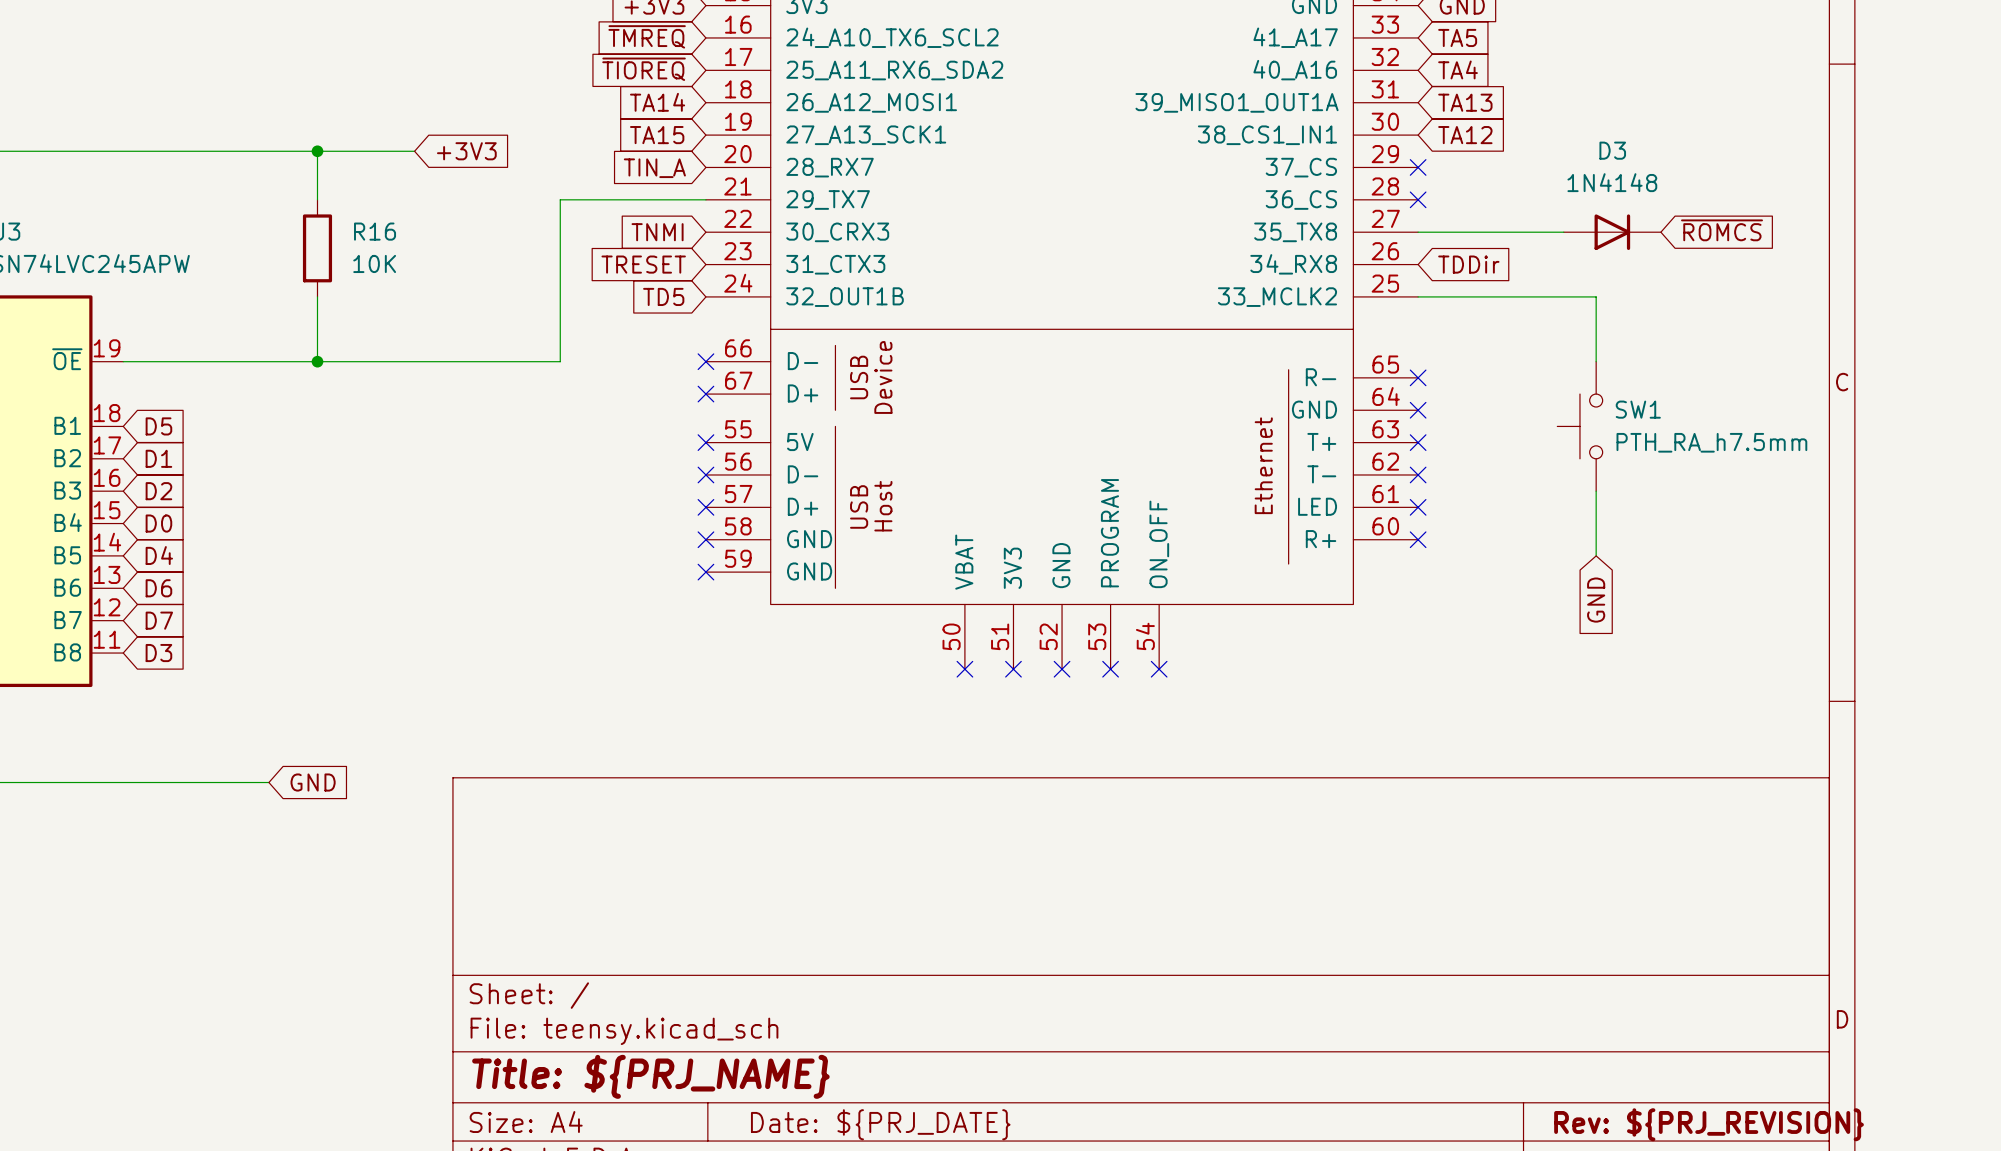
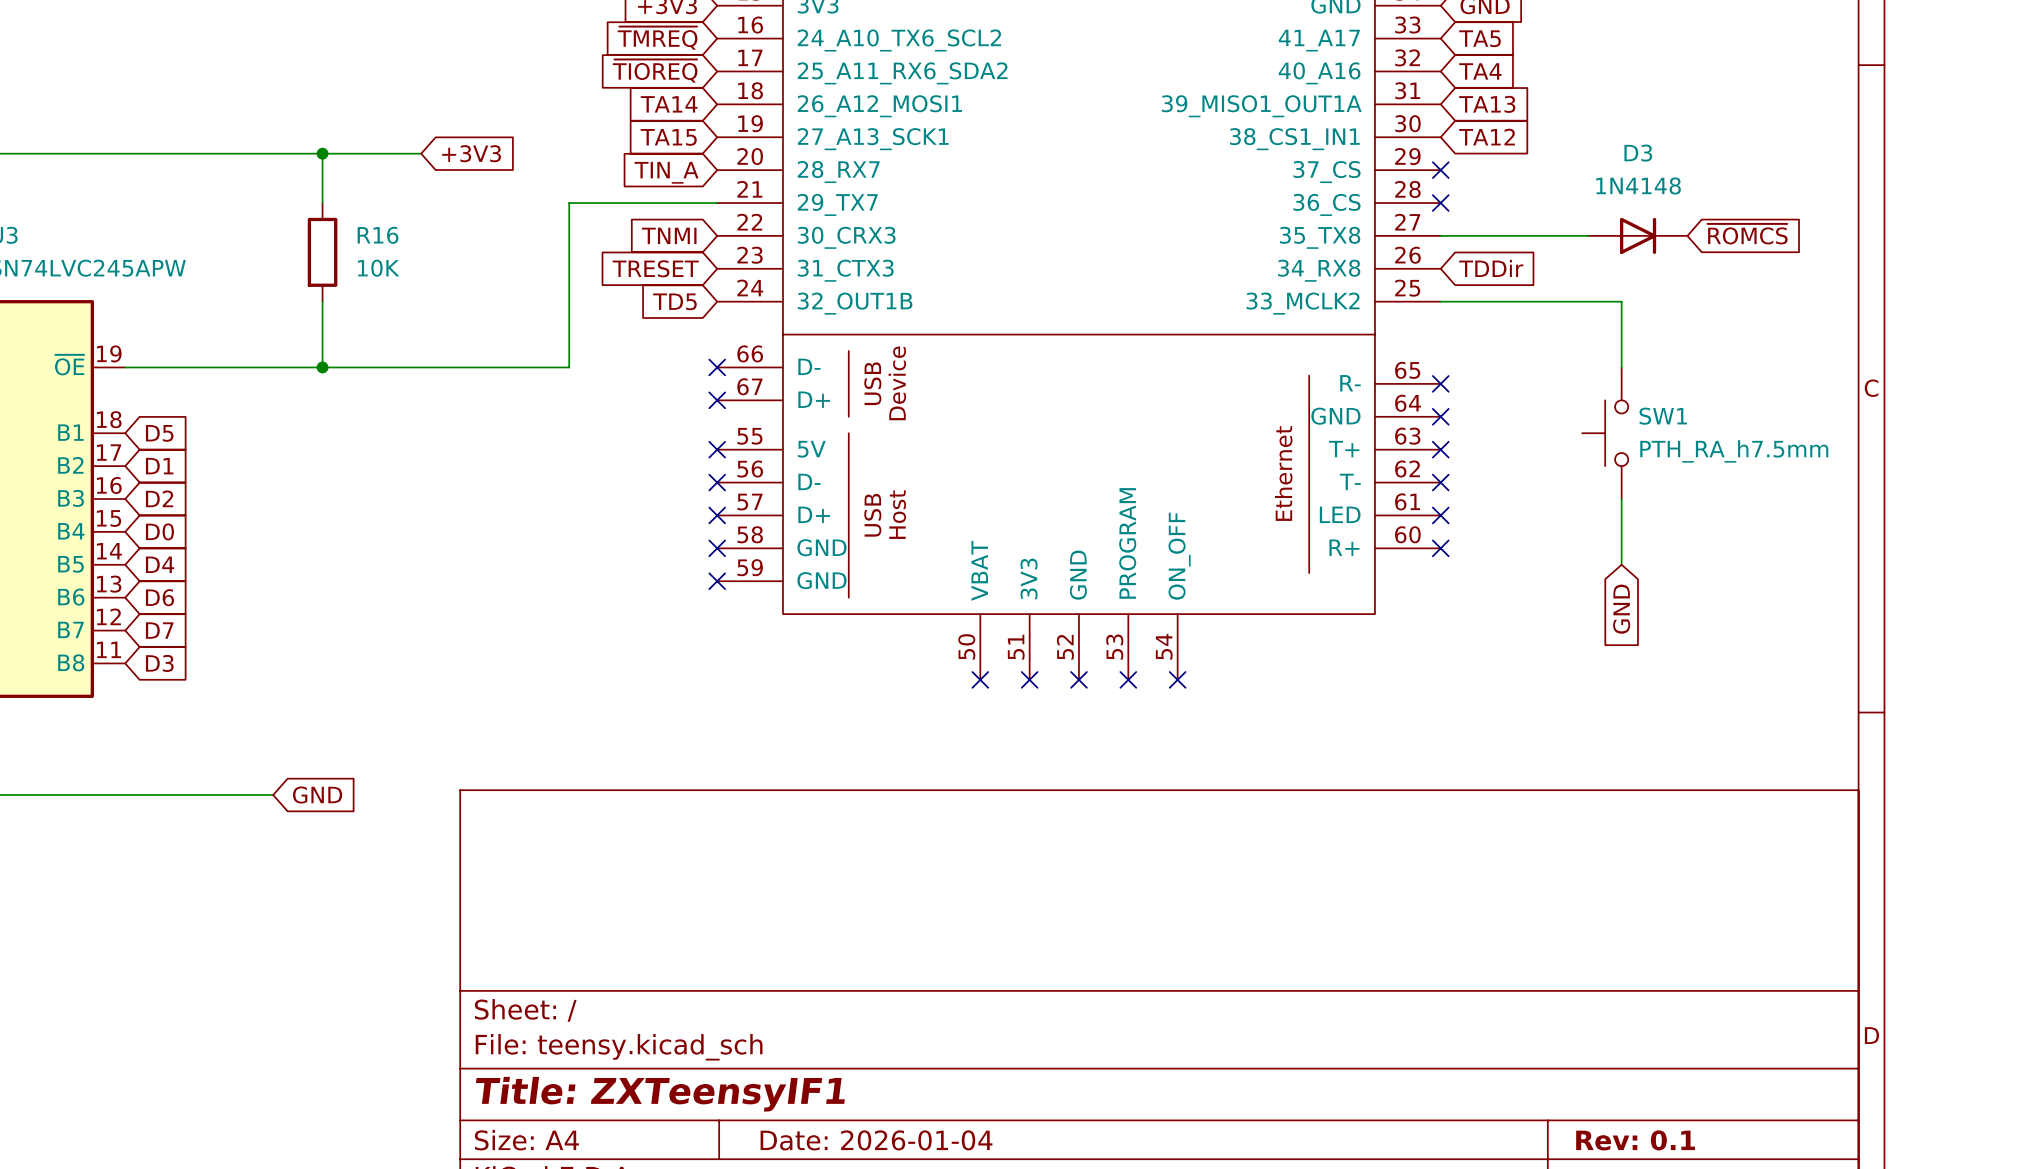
title block: Title: ${PRJ_NAME} (650, 1076) -> Title: ZXTeensyIF1 (660, 1094)
title block: Date: ${PRJ_DATE} (880, 1124) -> Date: 2026-01-04 (876, 1140)
title block: Rev: ${PRJ_REVISION} (1709, 1124) -> Rev: 0.1 (1635, 1140)

